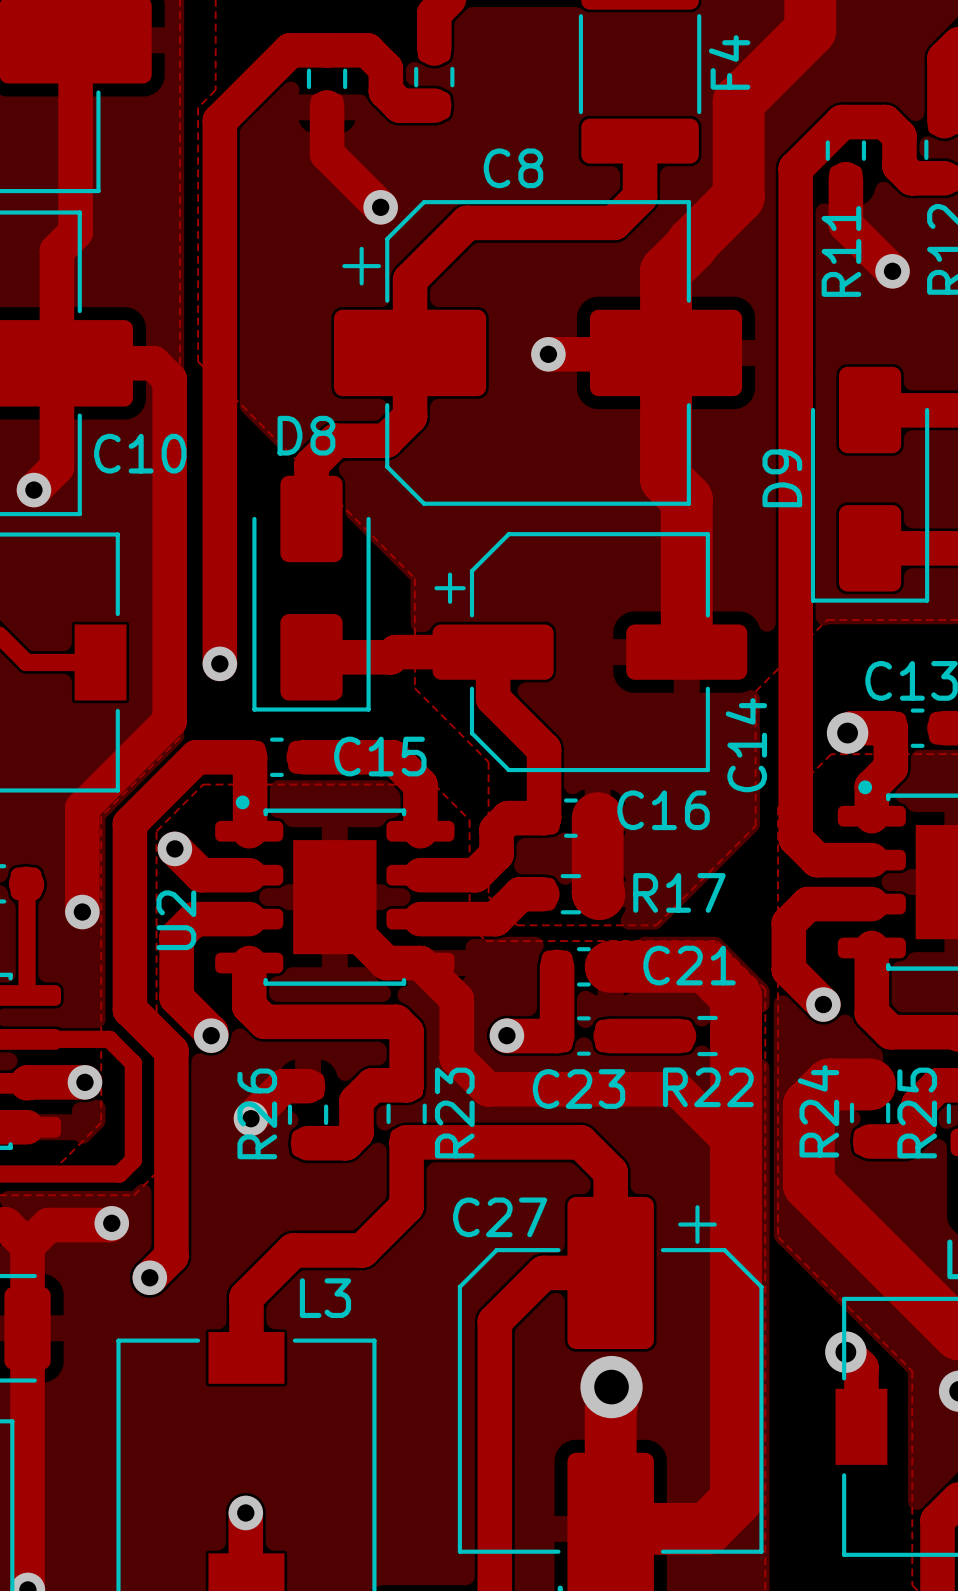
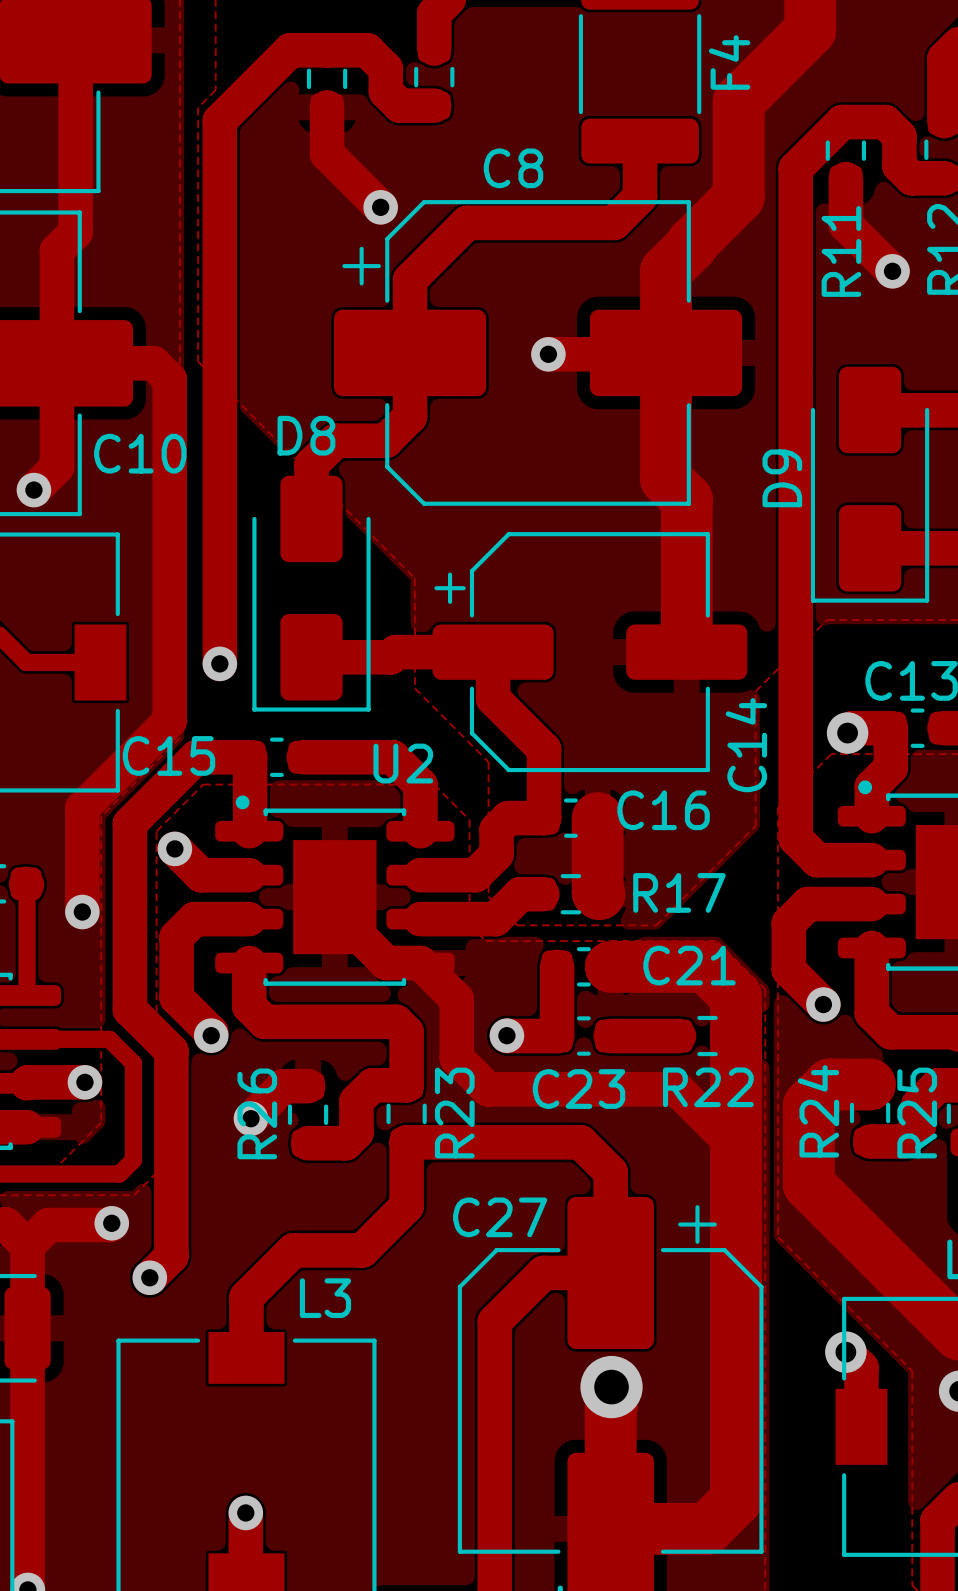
C15 name position: C15 (380, 756) -> C15 (169, 755)
U2 name rotation: 0° (176, 920) -> 90° clockwise (403, 763)
U2 name position: U2 (176, 920) -> U2 (403, 763)

